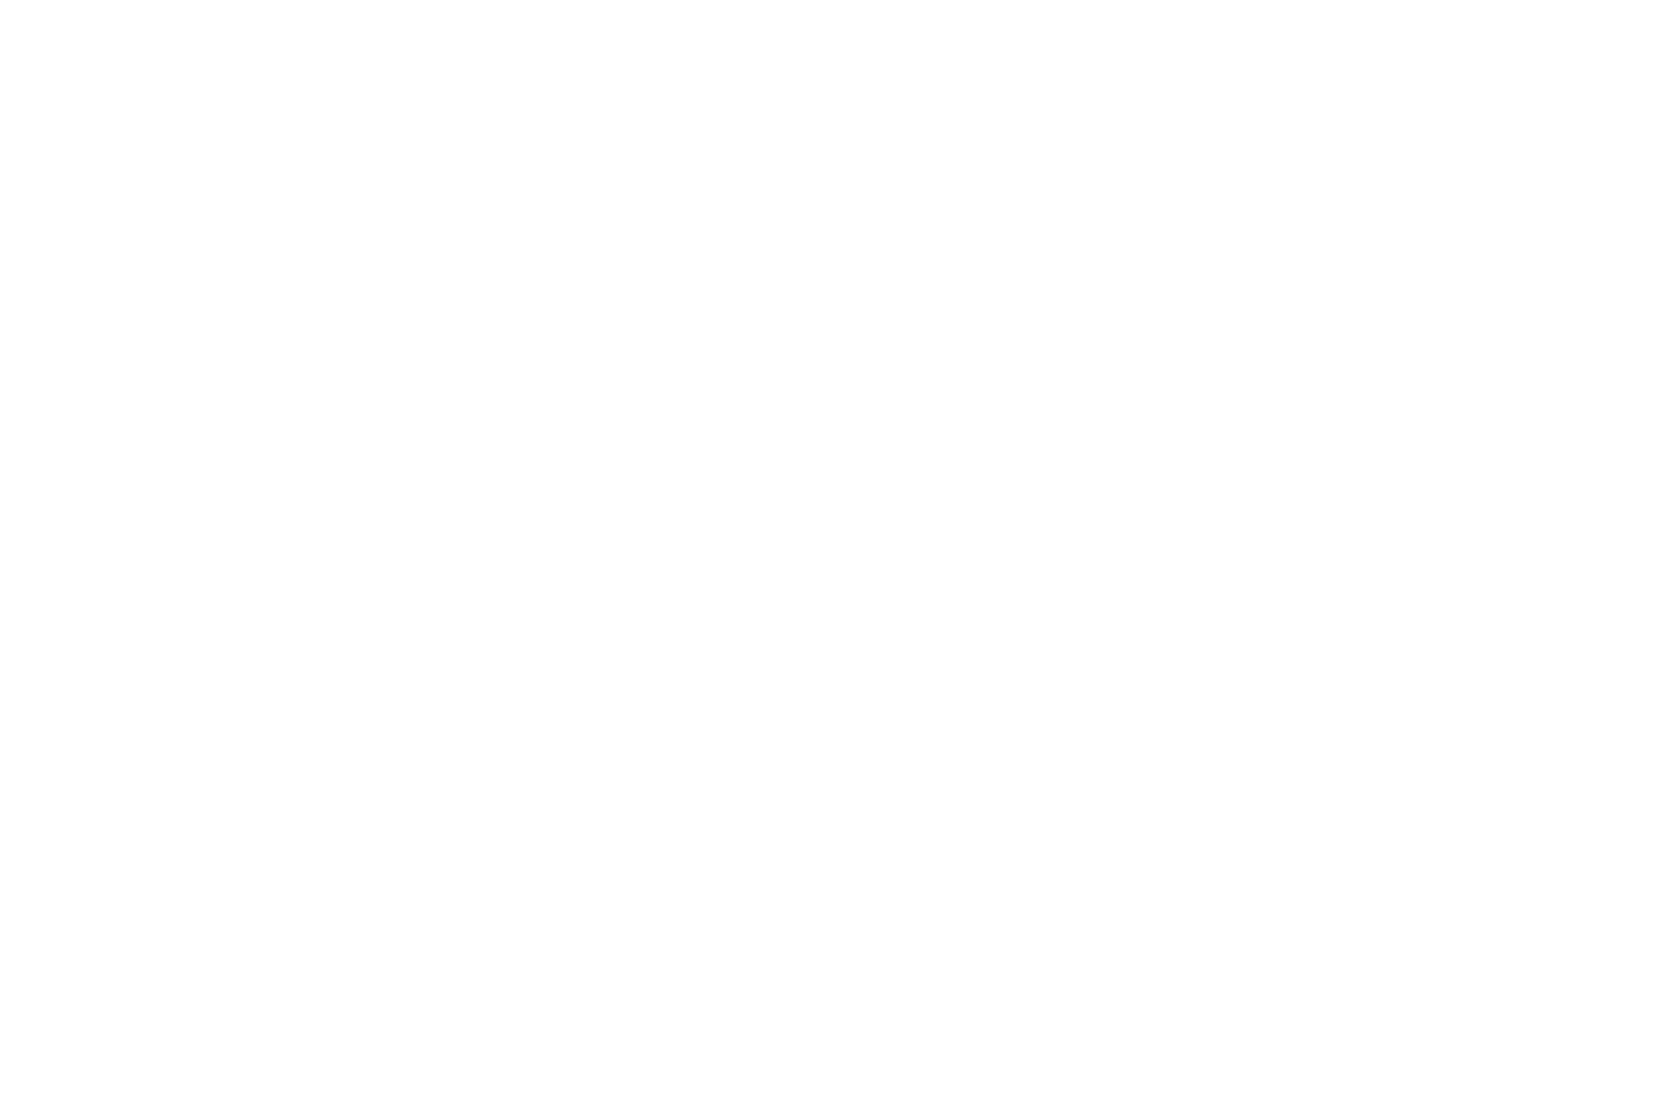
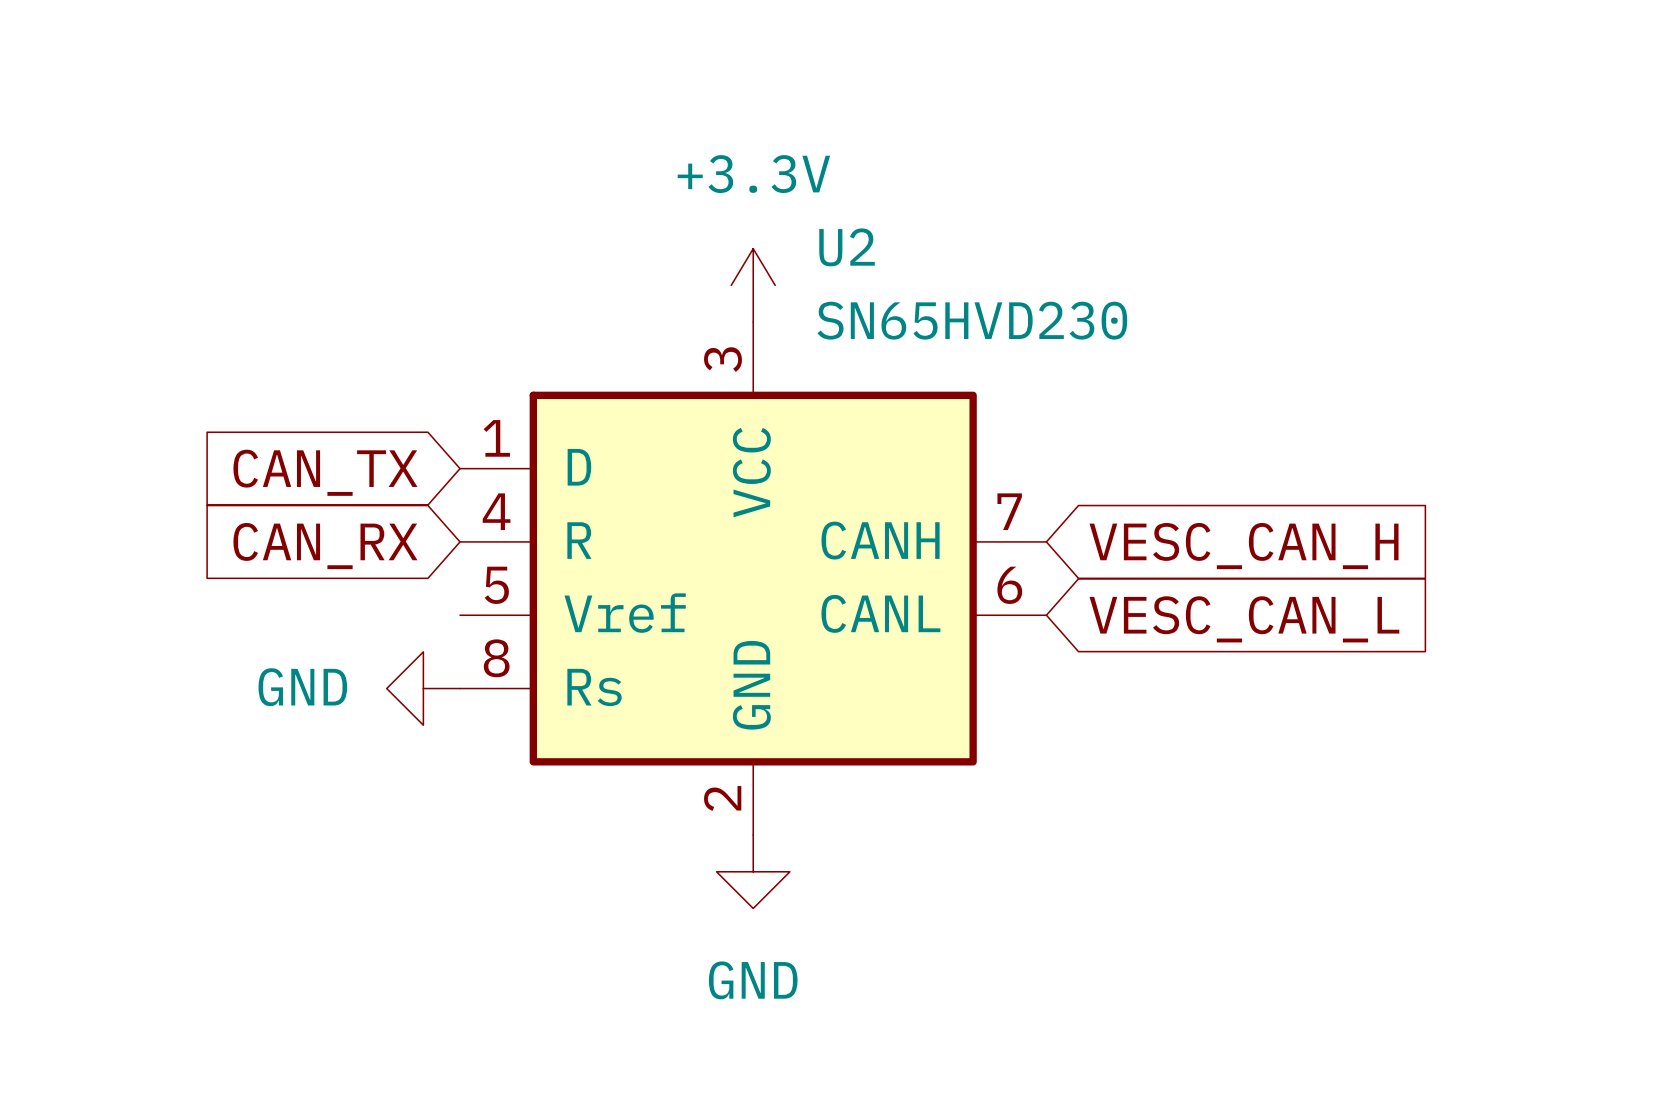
power symbol: none -> +3.3V (753, 285)
global label: none -> CAN_TX (325, 472)
global label: none -> CAN_RX (325, 546)
global label: none -> VESC_CAN_H (1244, 546)
U2: none -> SN65HVD230 (753, 578)
global label: none -> VESC_CAN_L (1244, 619)
power symbol: none -> GND (423, 688)
power symbol: none -> GND (753, 871)

